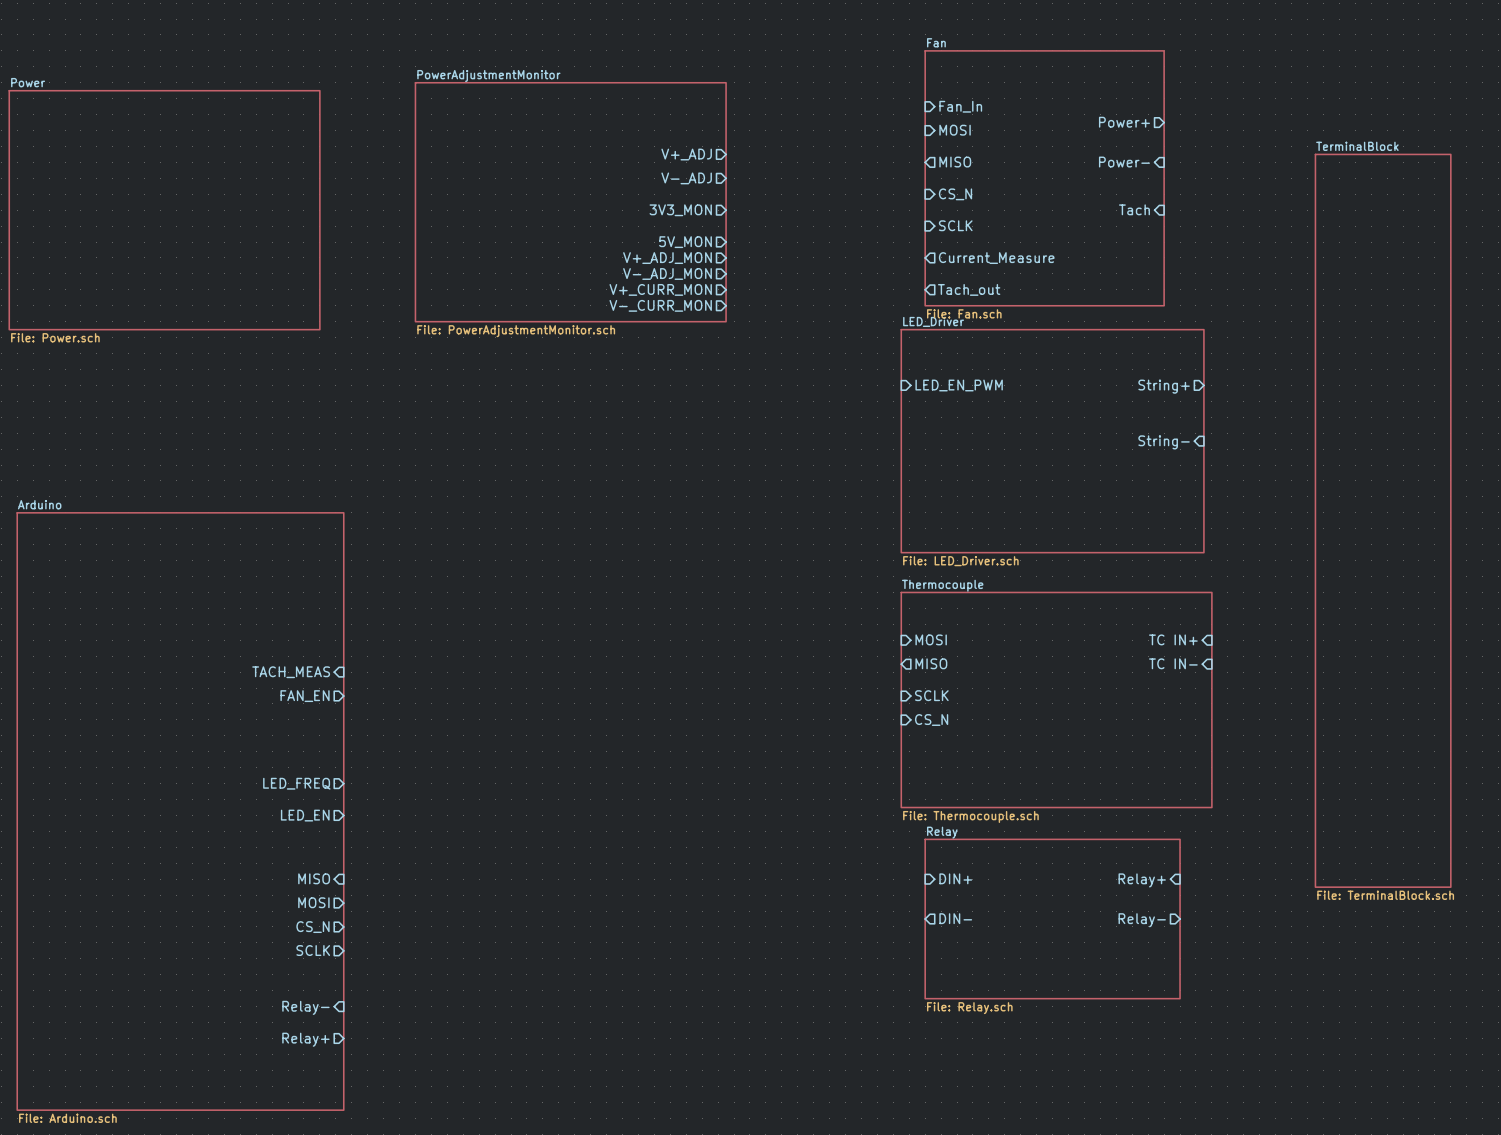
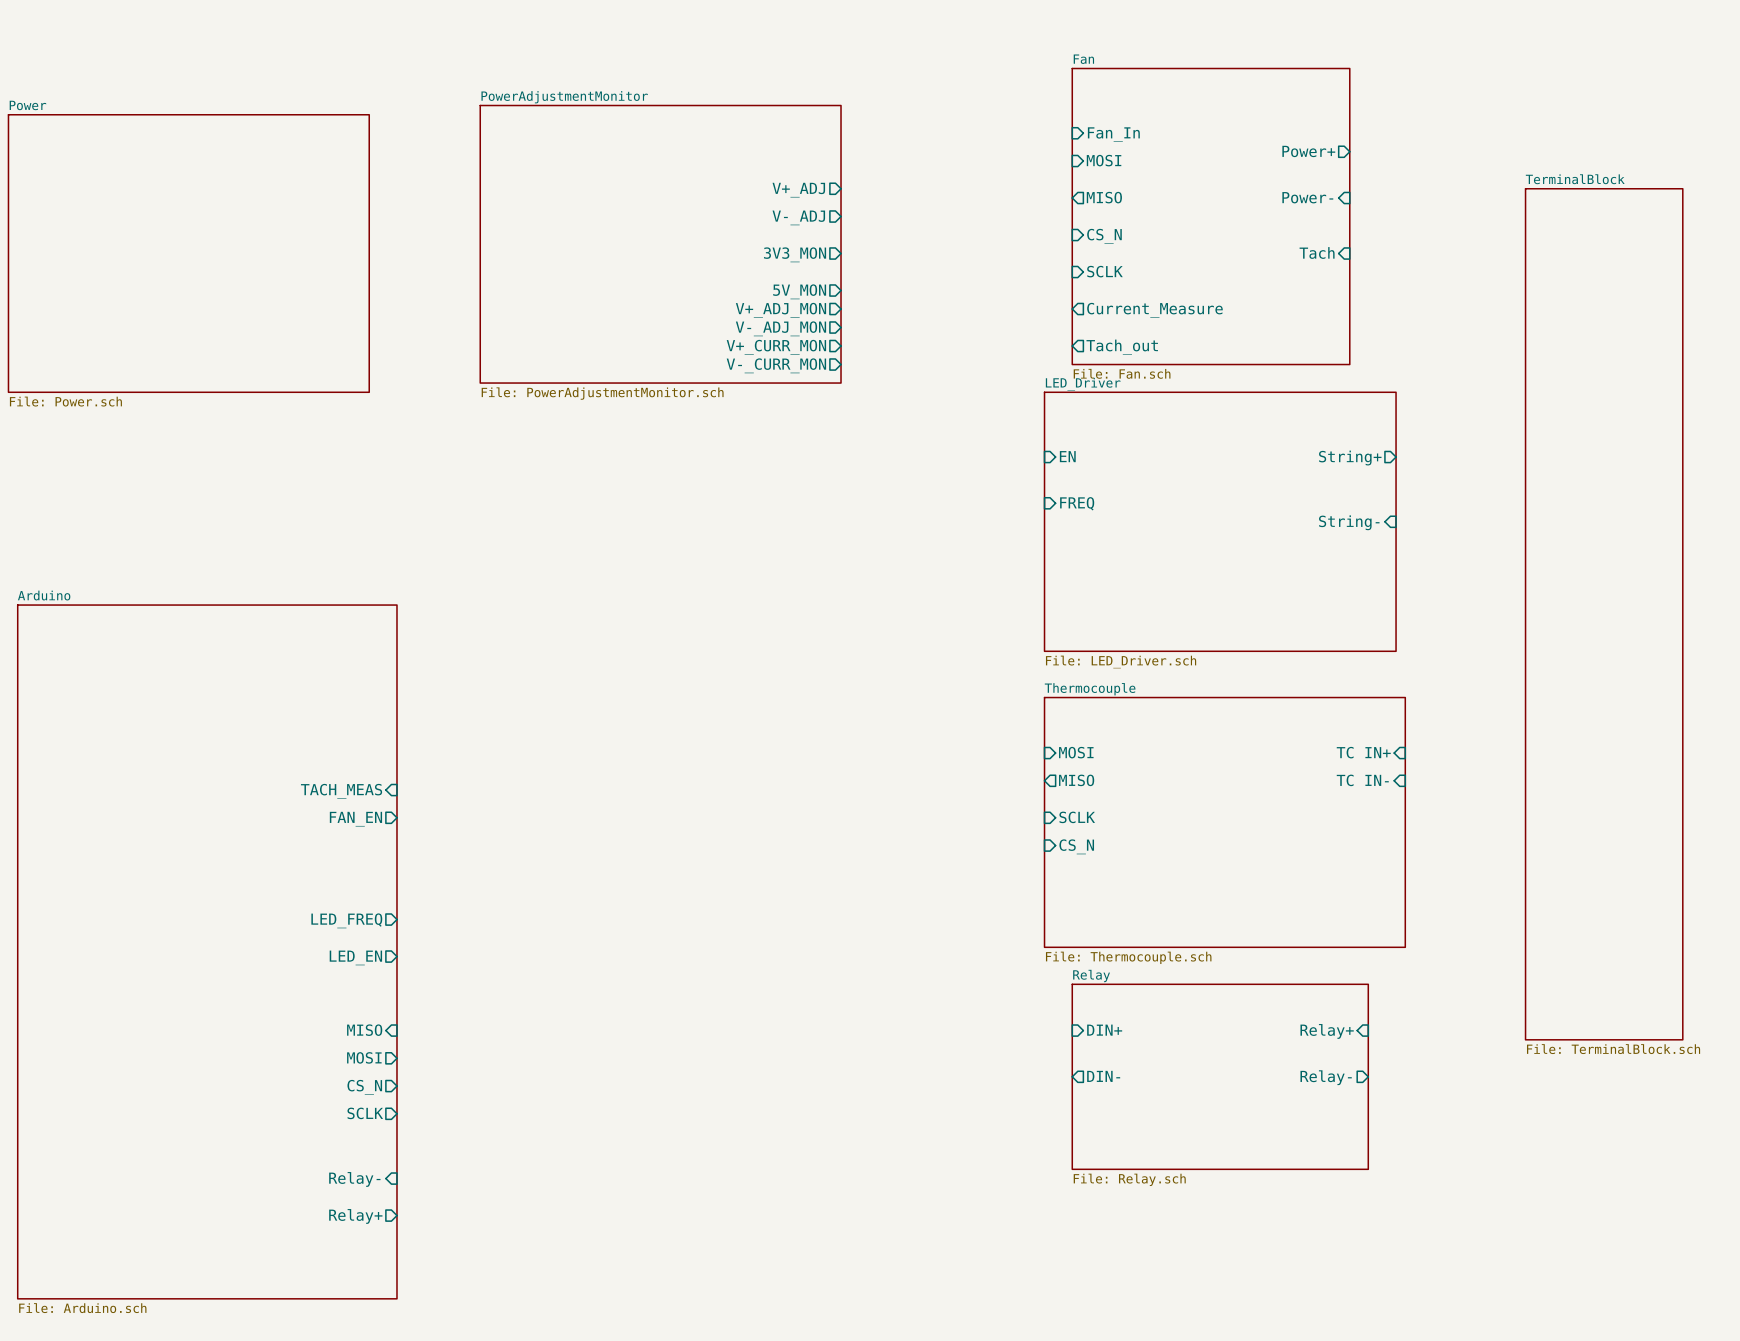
sheet pin: LED_EN_PWM (959, 385) -> EN (1067, 456)
sheet pin: none -> FREQ (1077, 503)

